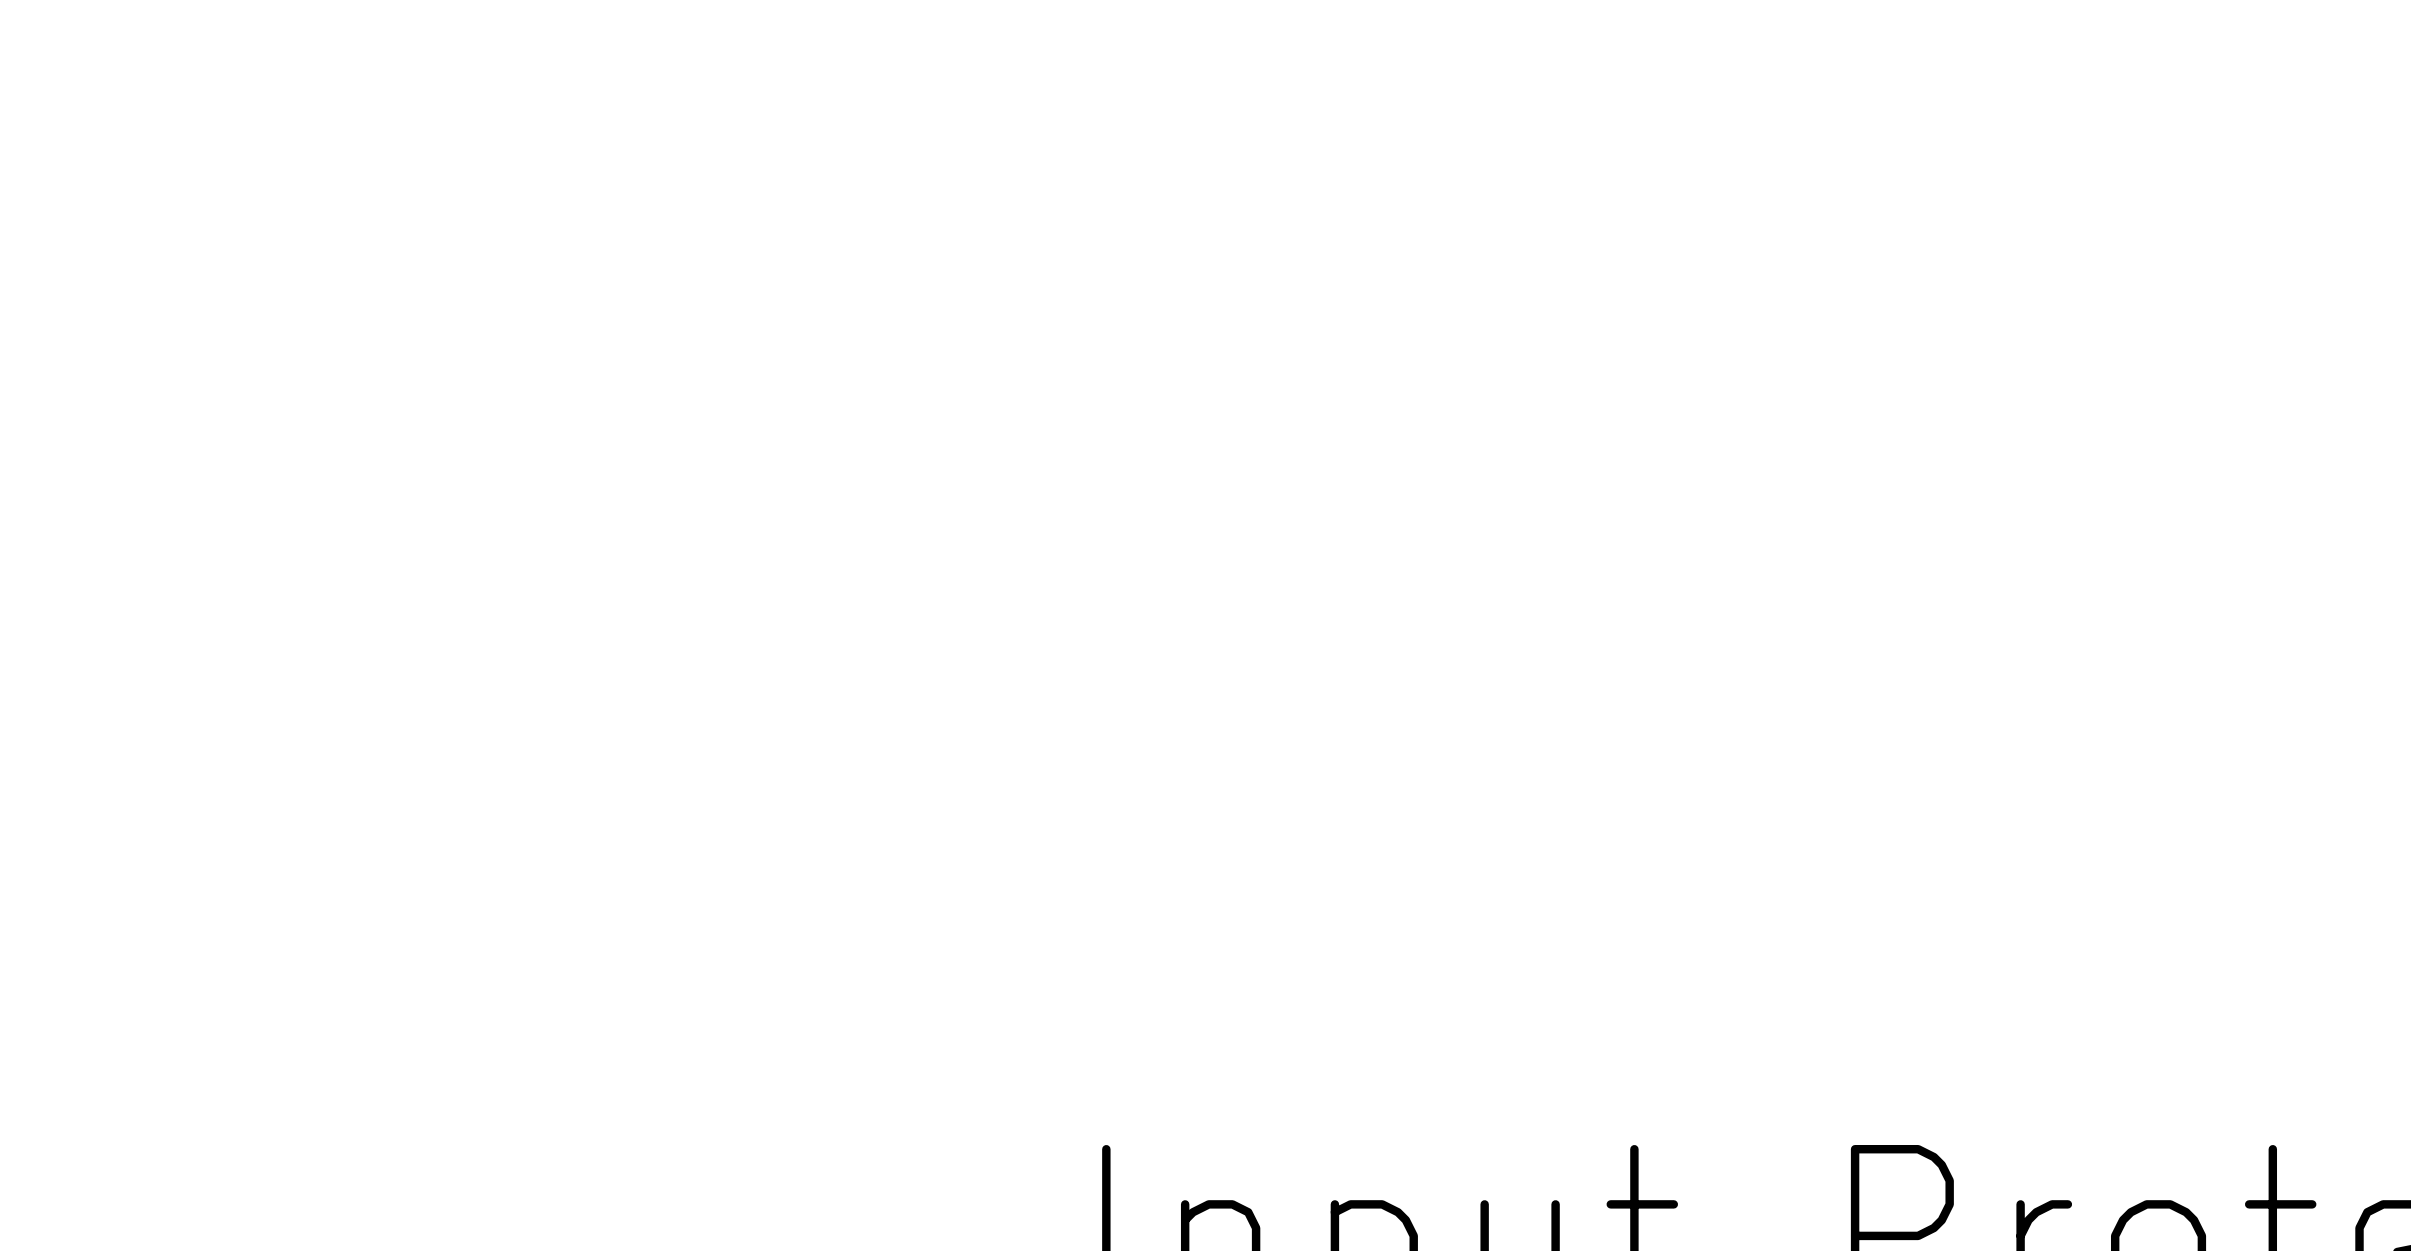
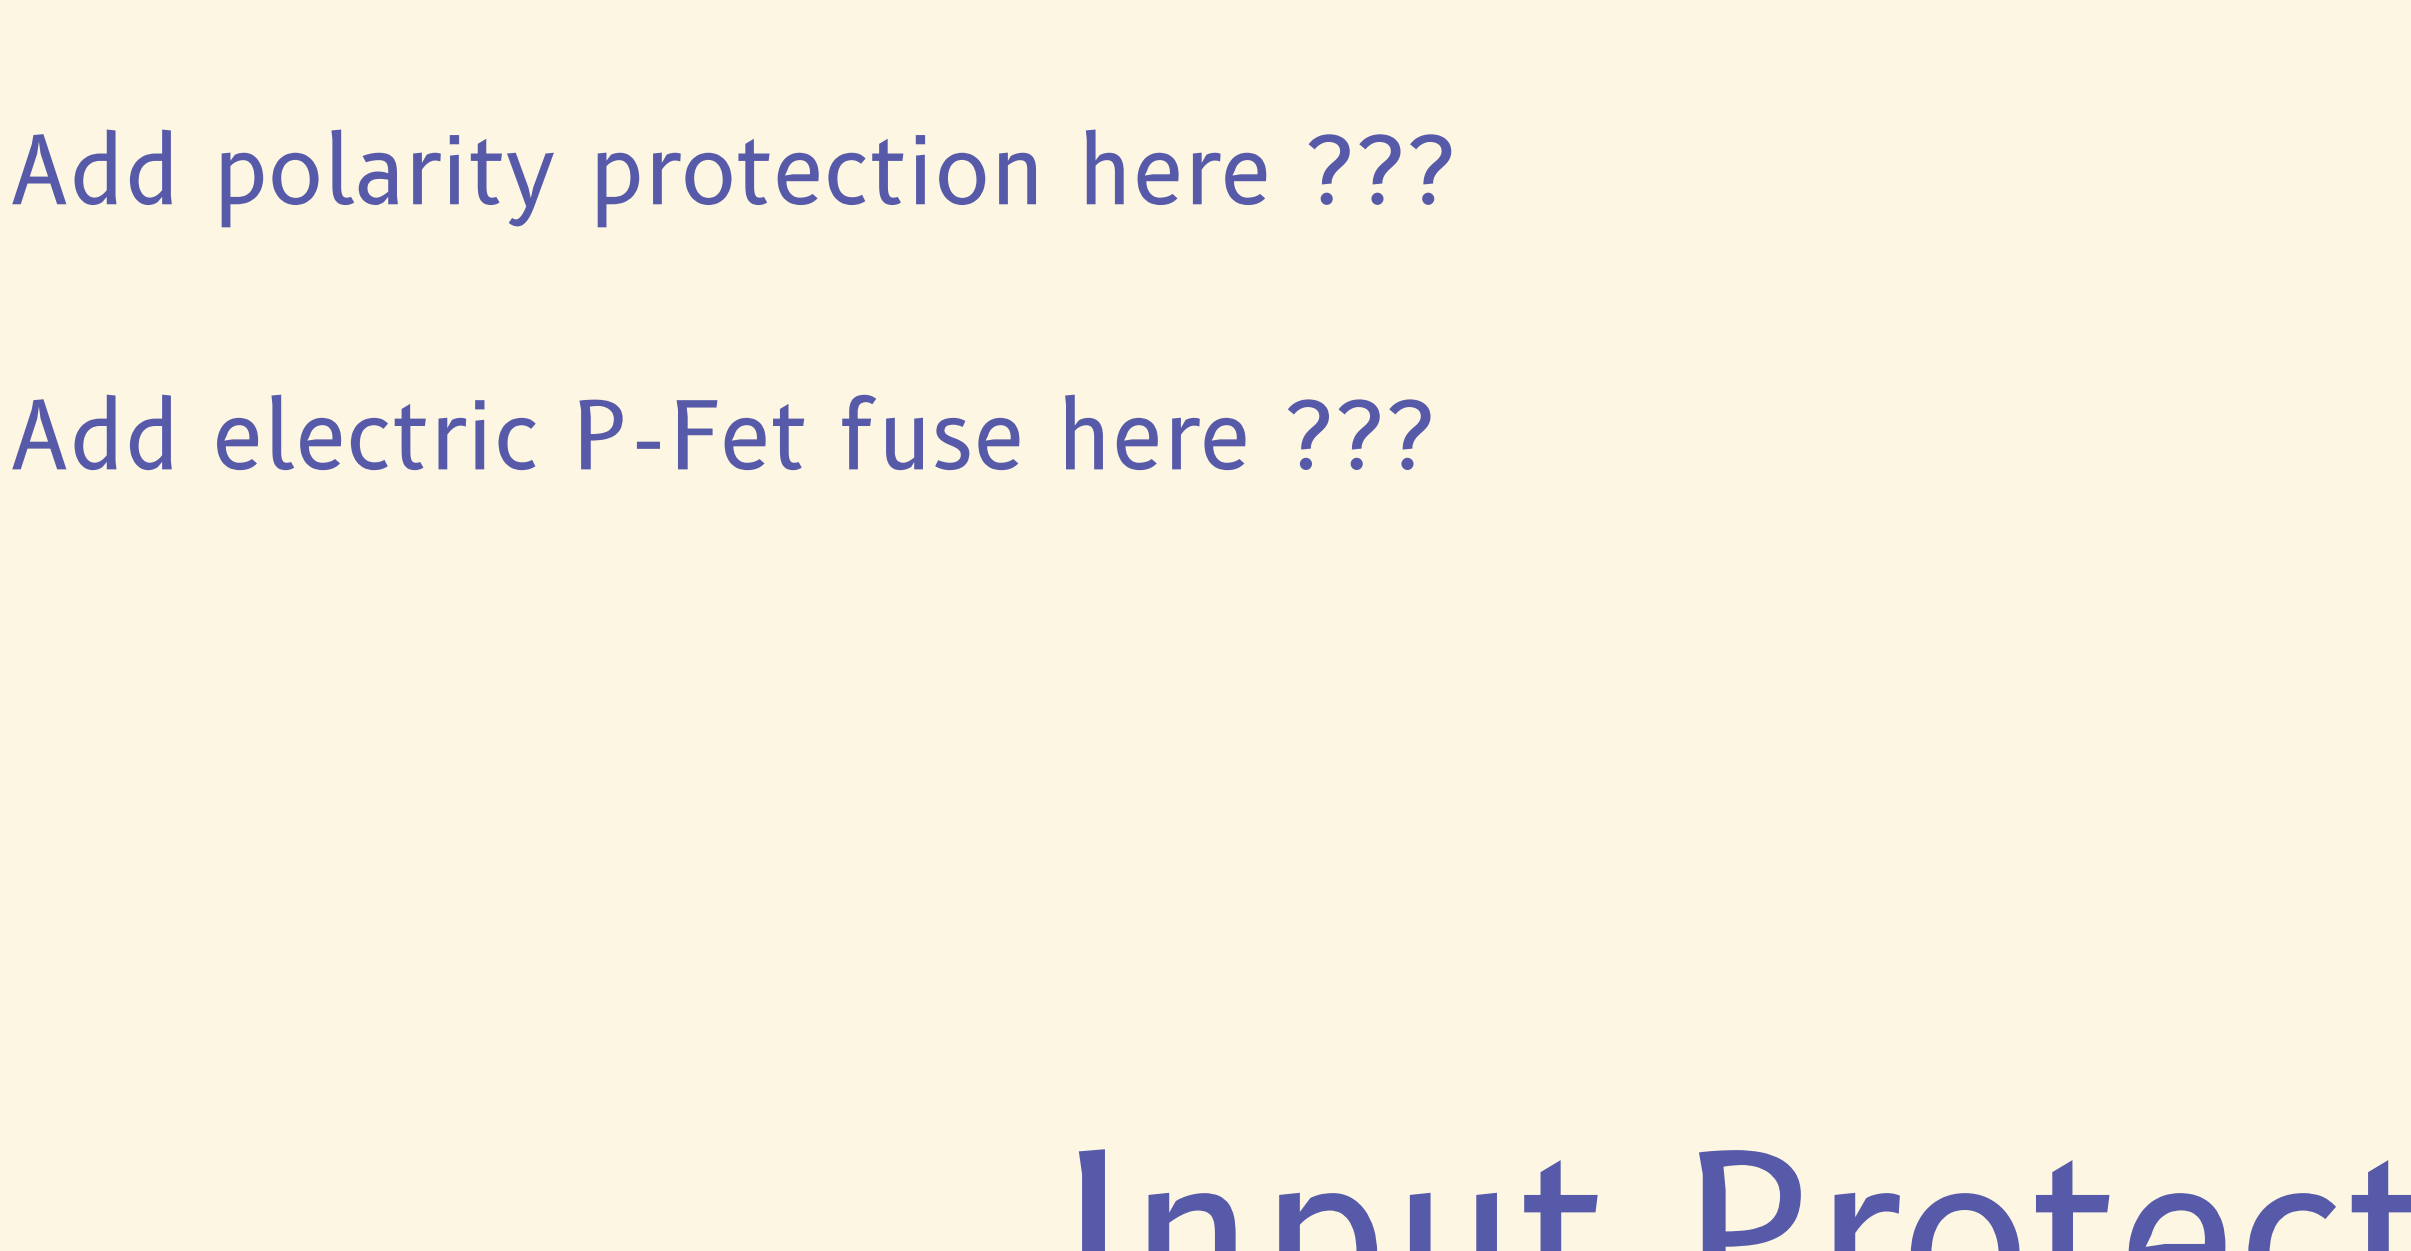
text: none -> Add polarity protection here ??? (731, 178)
text: none -> Add electric P-Fet fuse here ??? (721, 432)

